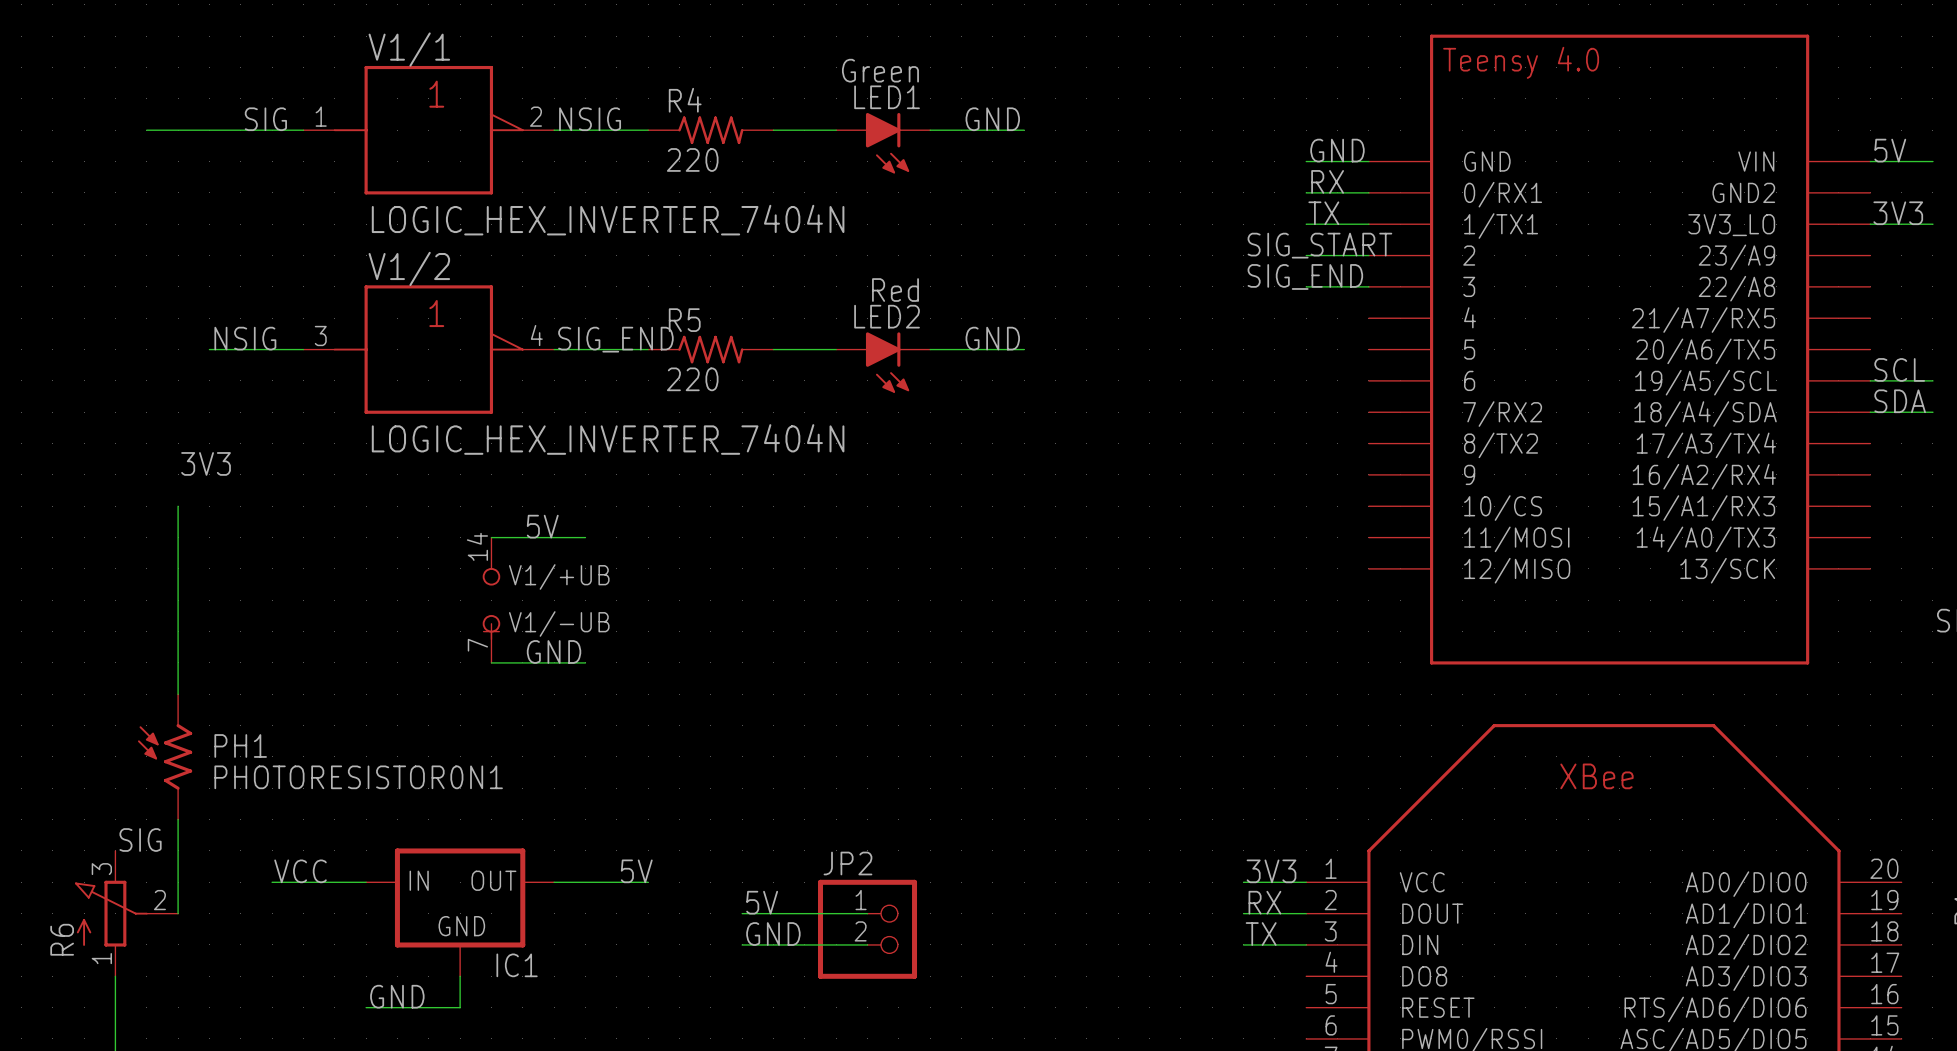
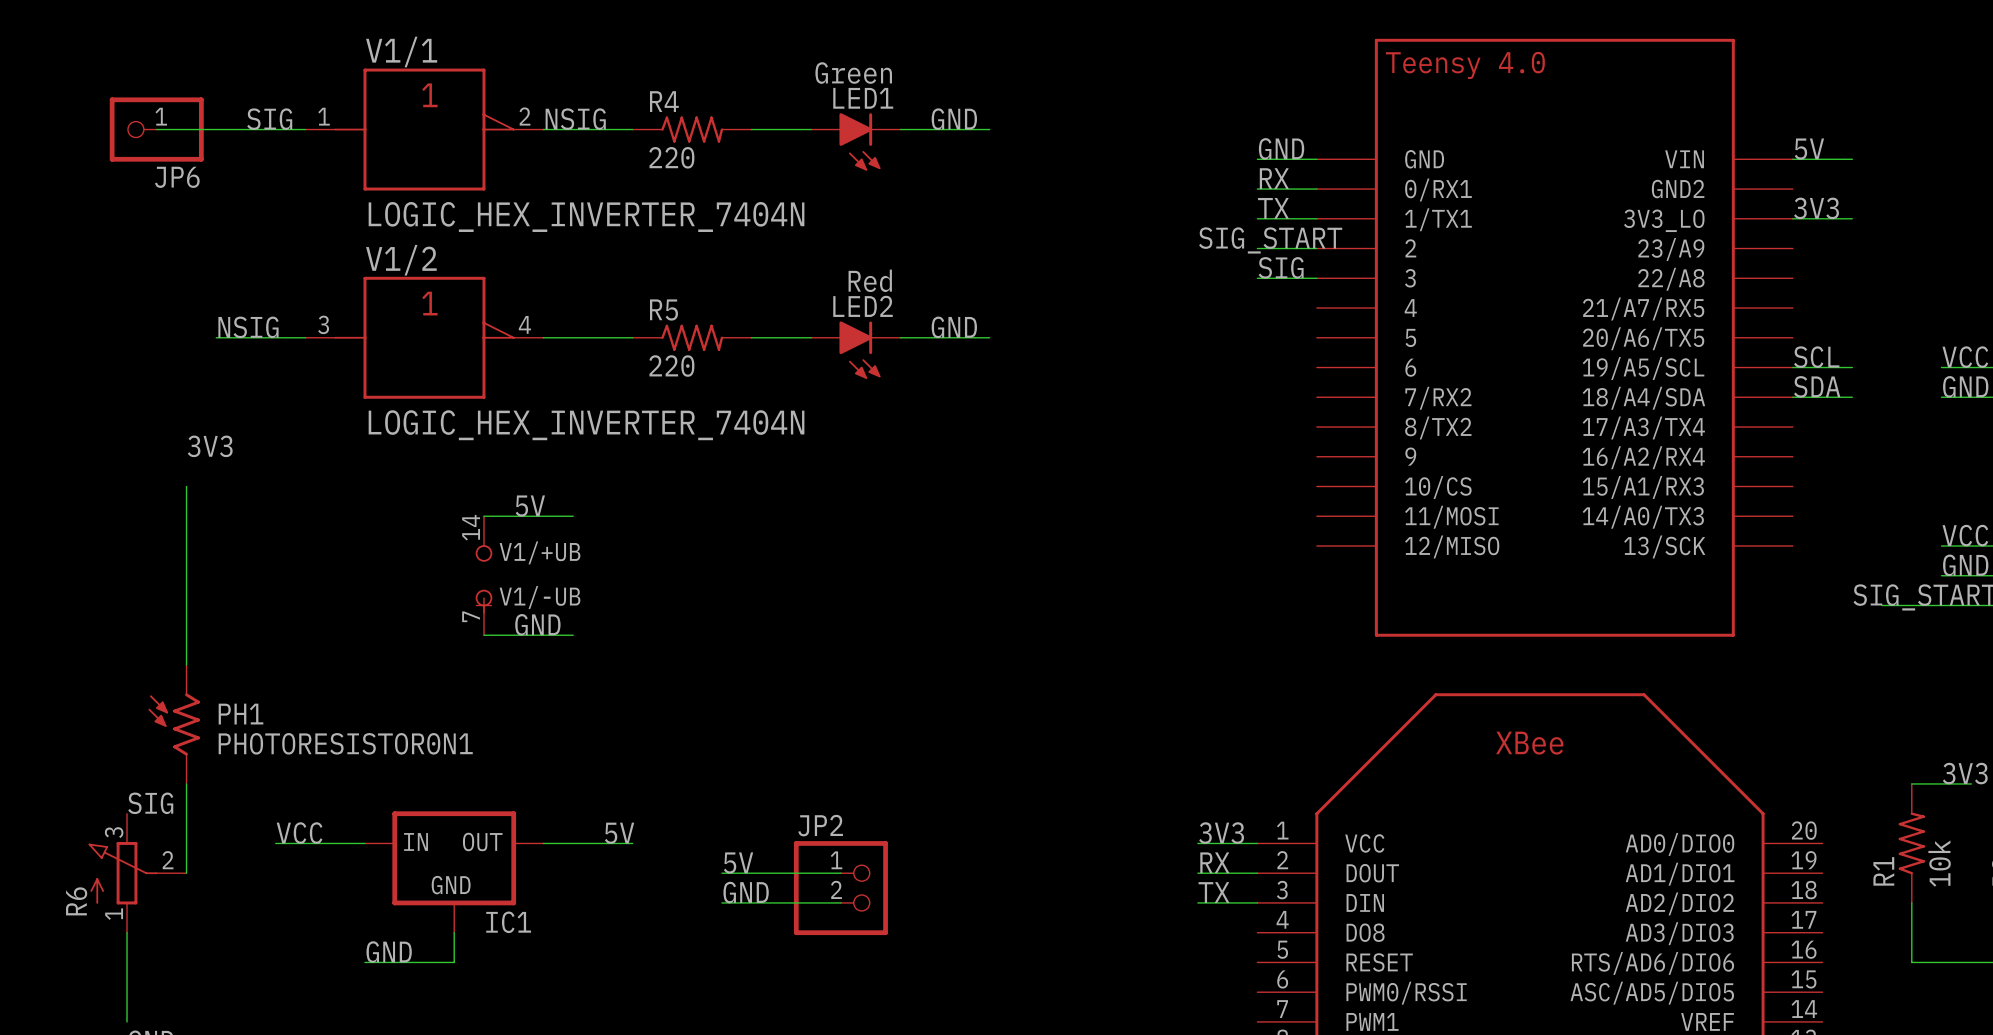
JP6: none -> (156, 129)
label: none -> SIG (1281, 267)
label: SIG_END (1305, 276) -> none
label: SIG_END (615, 339) -> none

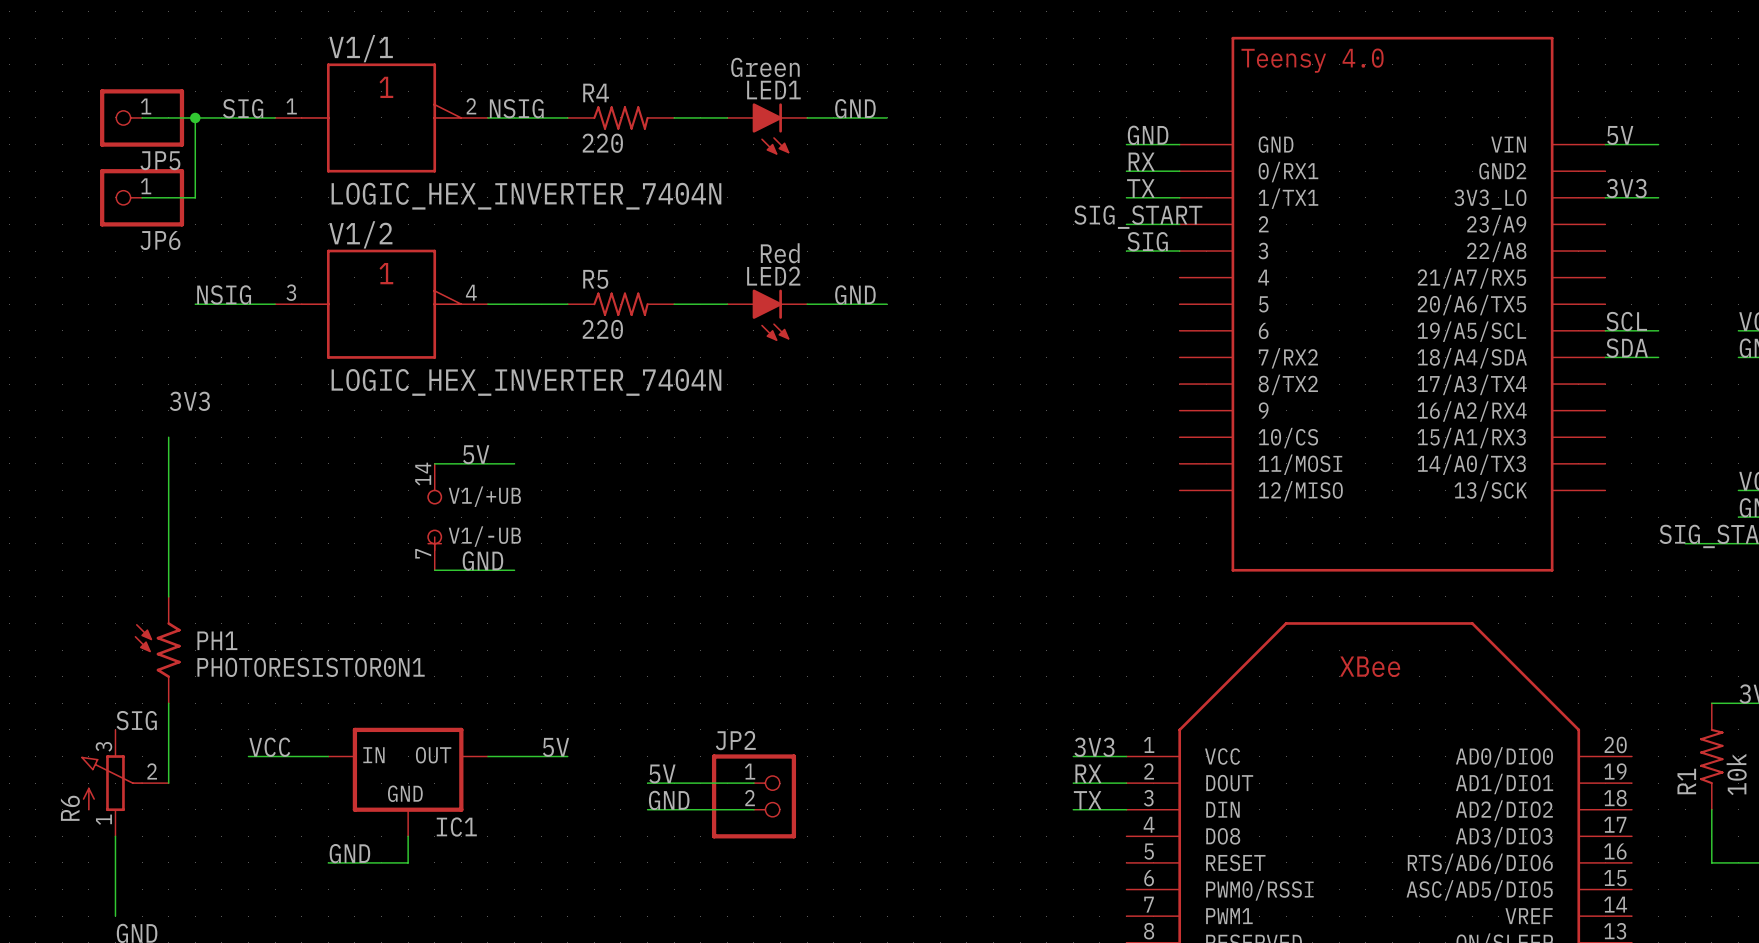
wire: none -> (195, 117) (195, 197) (142, 197)
junction: none -> (195, 117)
JP6 name: JP6 (177, 177) -> JP5 (160, 160)
JP6: none -> (142, 197)

